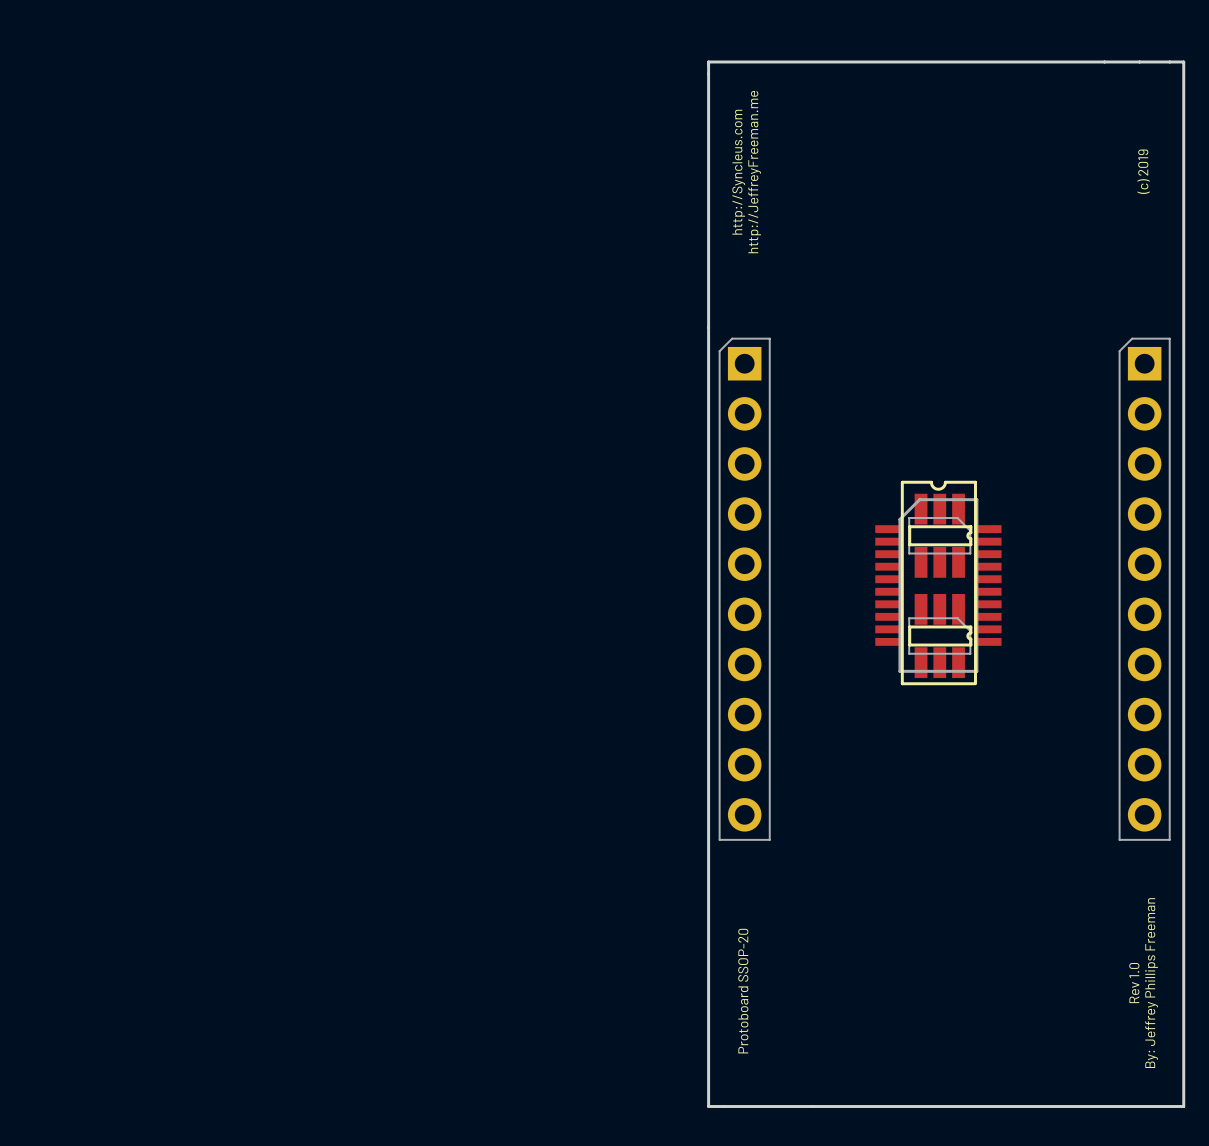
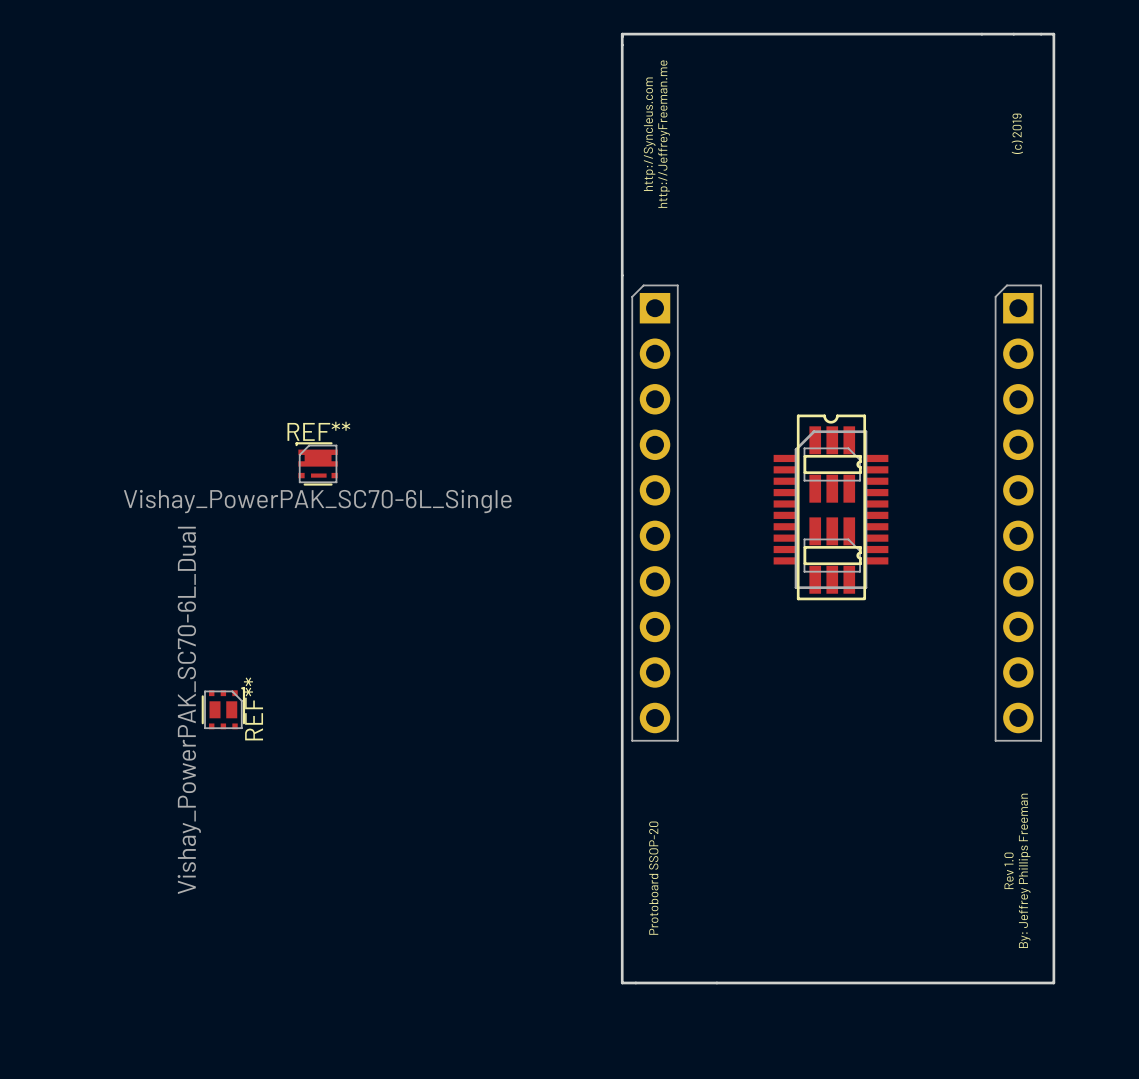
REF**: none -> Vishay_PowerPAK_SC70-6L_Single (316, 463)
REF**: none -> Vishay_PowerPAK_SC70-6L_Dual (223, 708)

